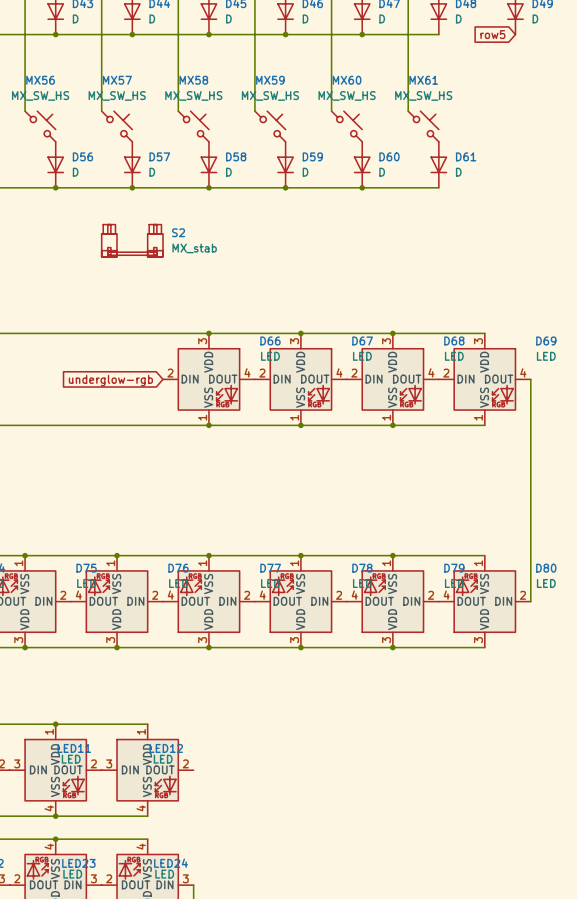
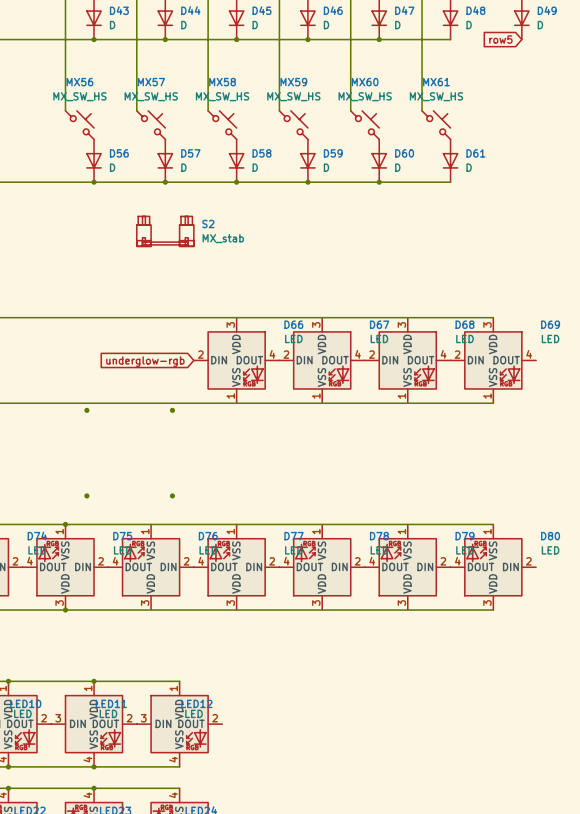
junction: (208, 333) -> none
junction: (300, 333) -> none
junction: (392, 333) -> none
wire: (530, 379) (530, 601) -> none
junction: (208, 425) -> none
junction: (300, 425) -> none
junction: (392, 425) -> none
junction: none -> (86, 410)
junction: none -> (172, 410)
junction: none -> (86, 495)
junction: none -> (172, 495)
junction: (117, 555) -> none
junction: (208, 555) -> none
junction: (300, 555) -> none
junction: (392, 555) -> none
junction: (117, 647) -> none
junction: (208, 647) -> none
junction: (300, 647) -> none
junction: (392, 647) -> none

